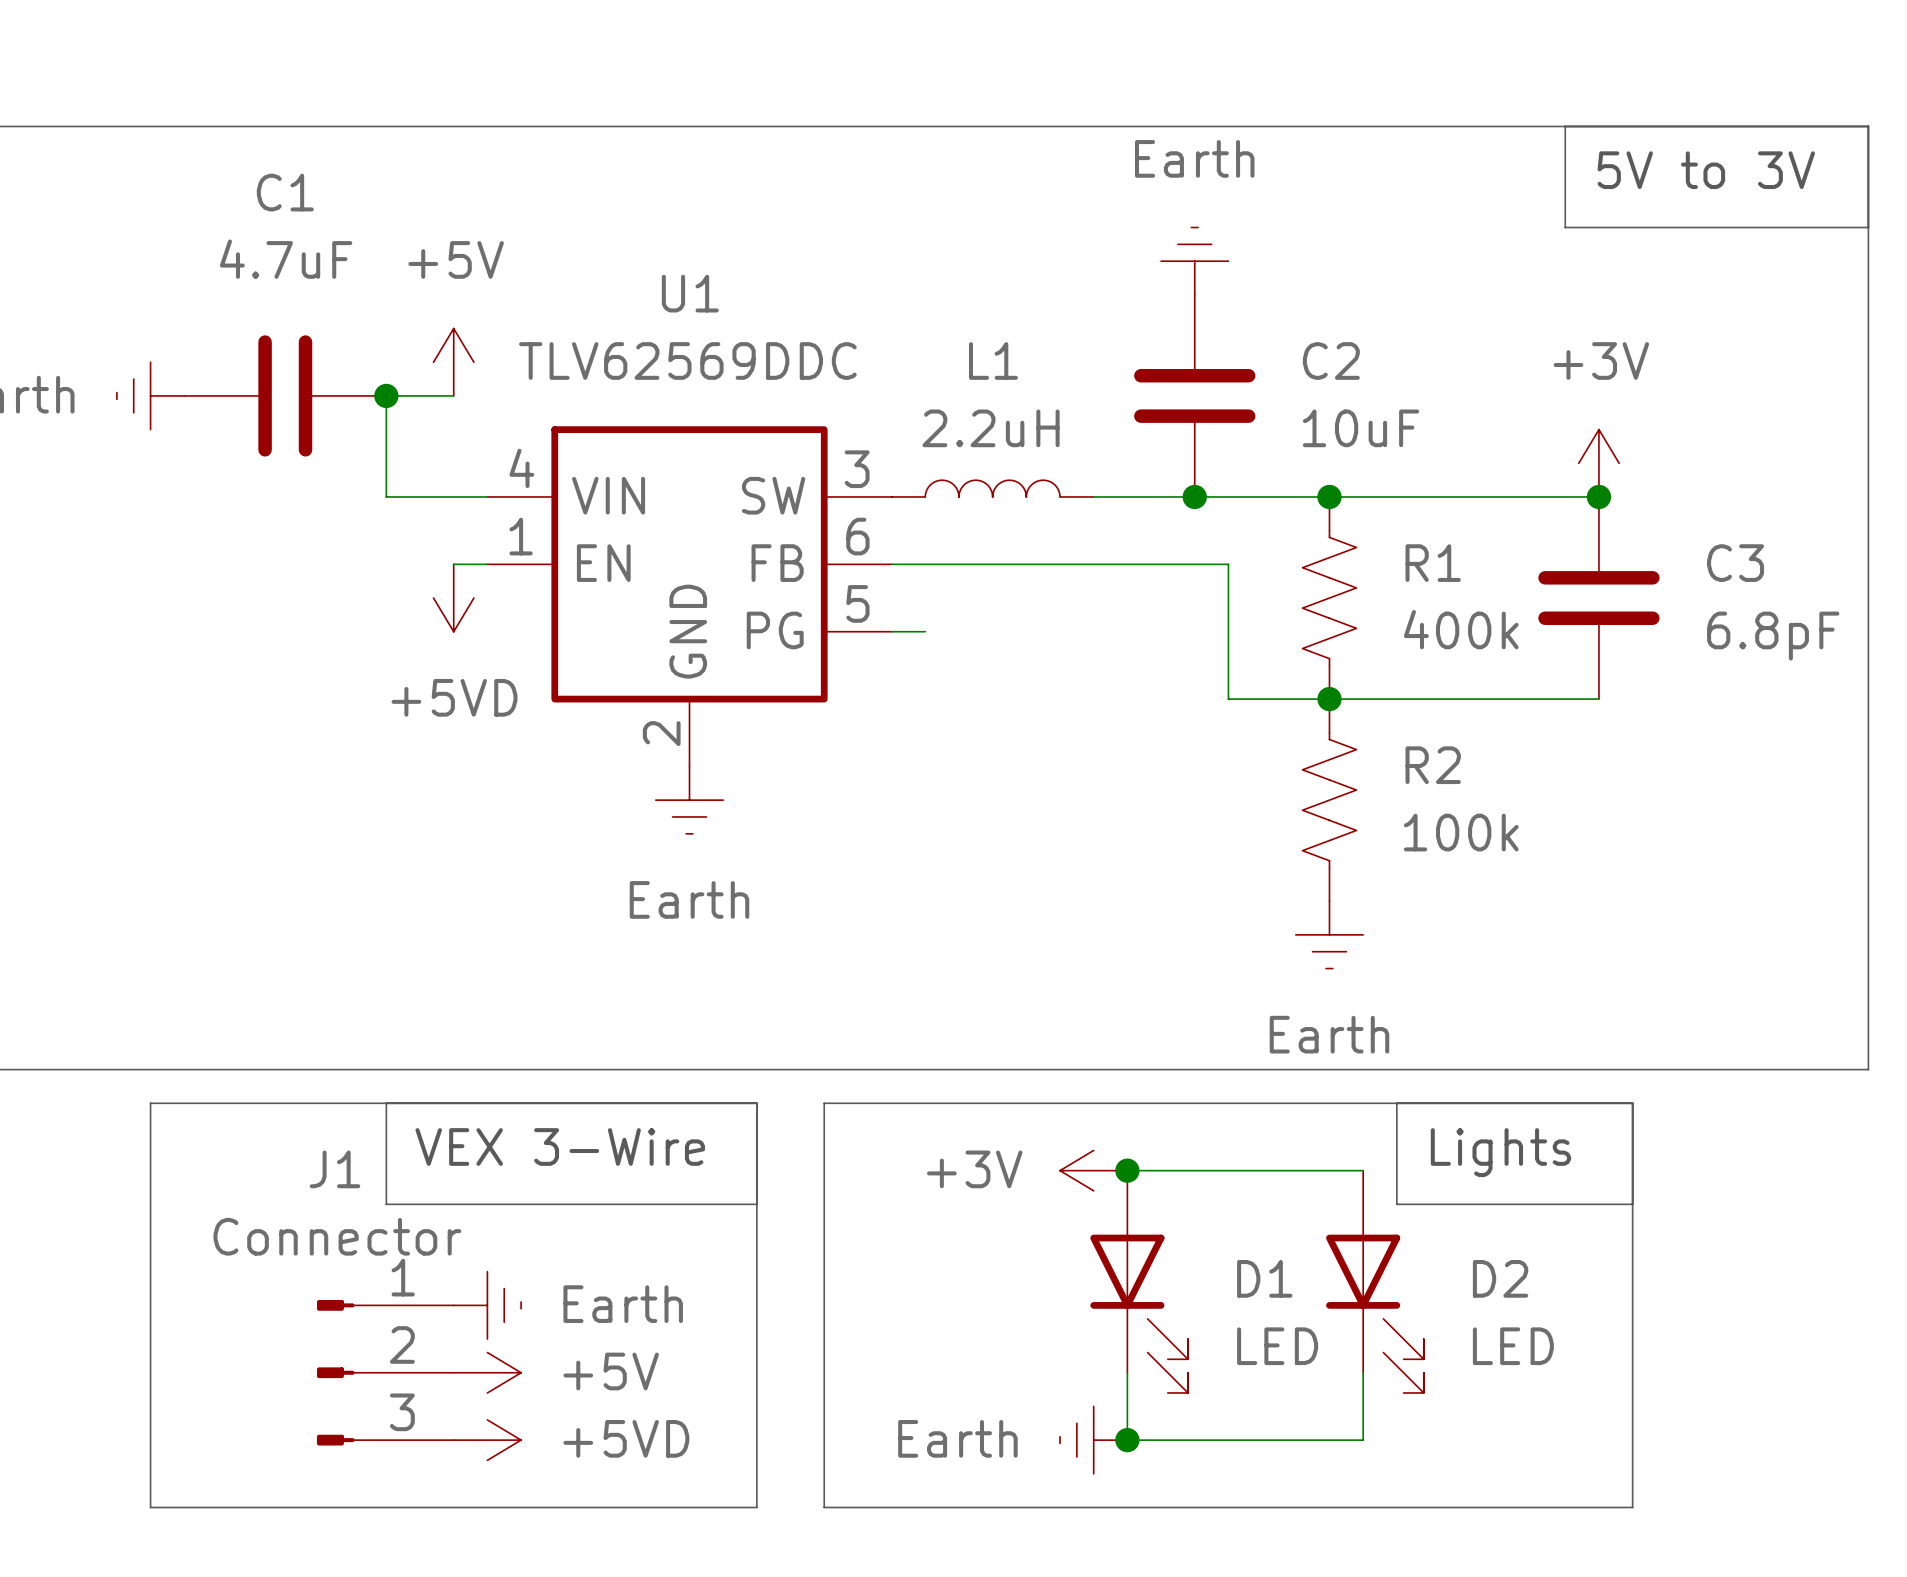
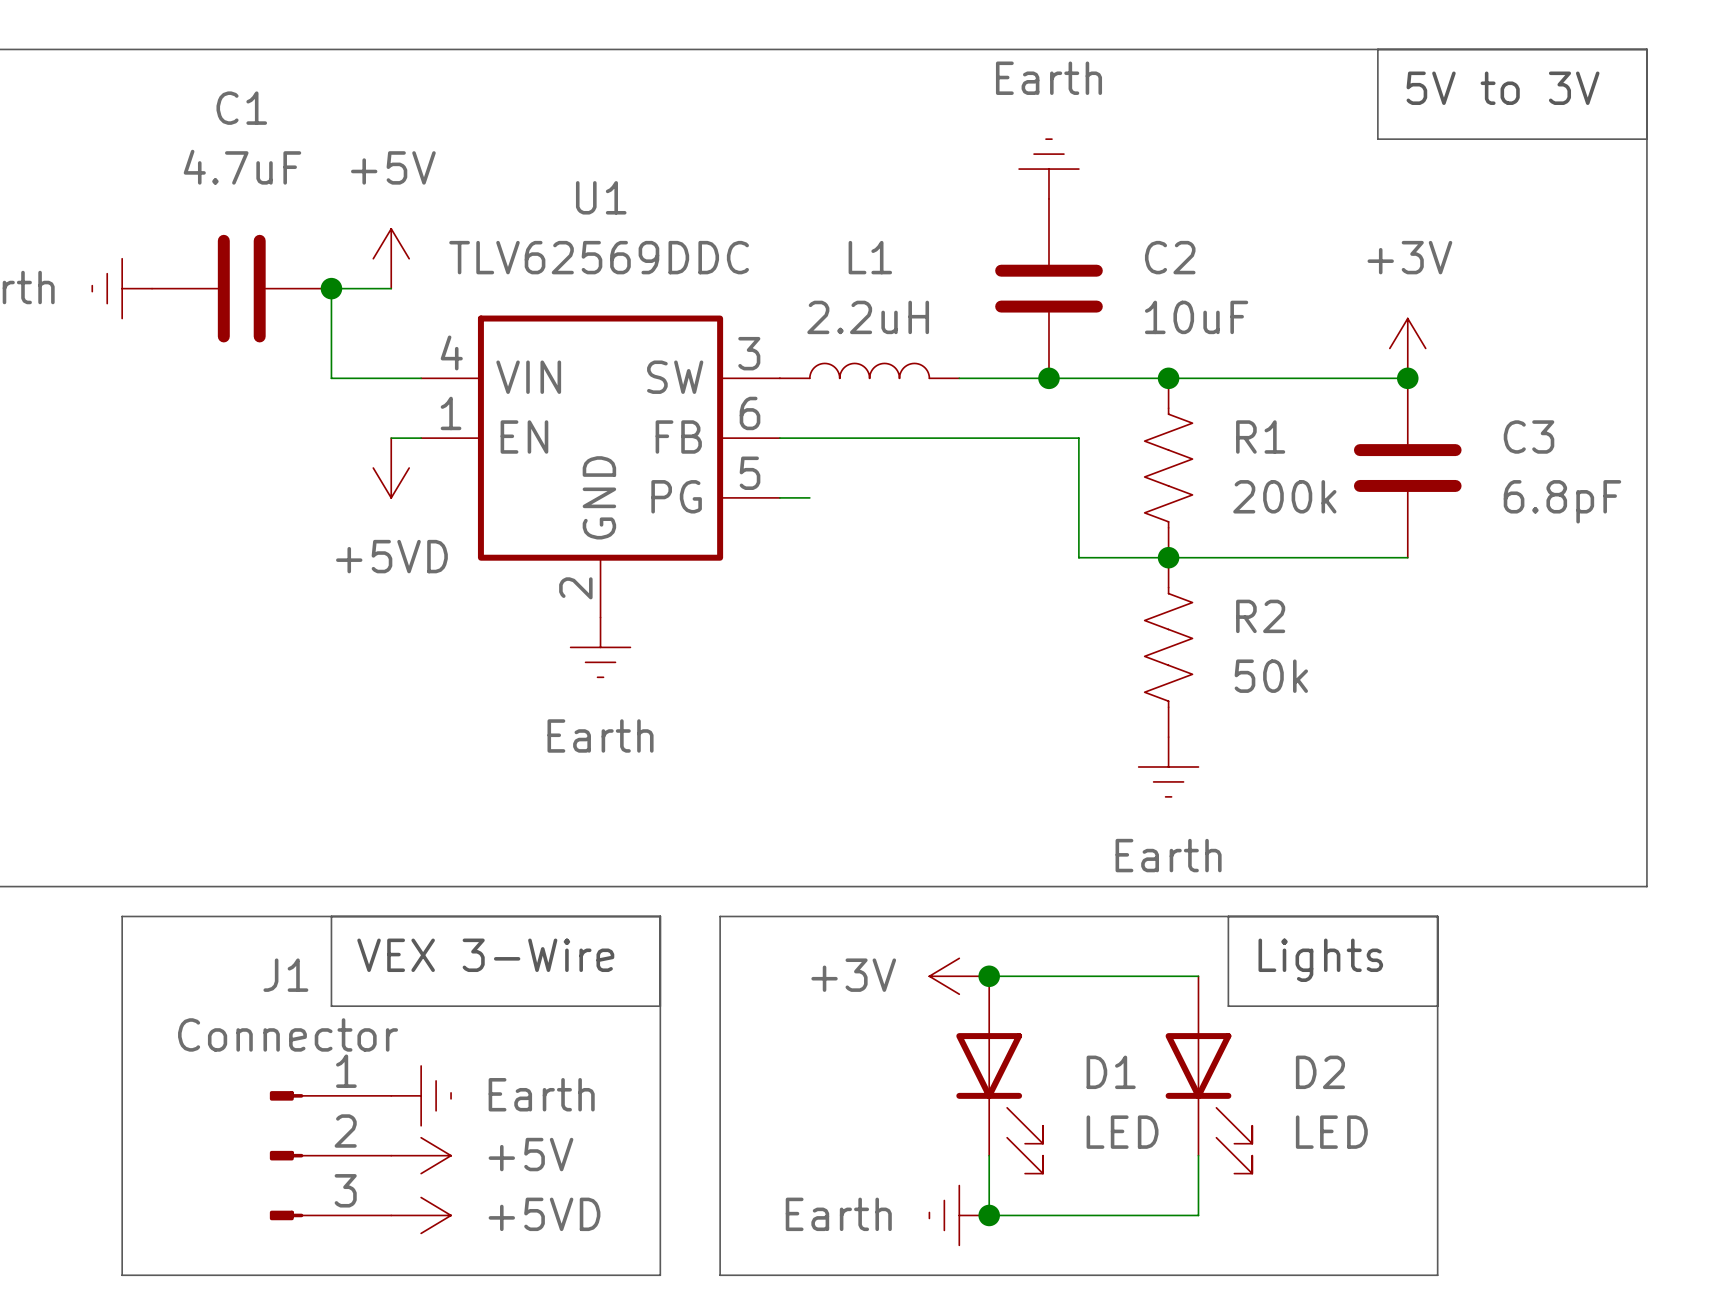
R1 value: 400k (1461, 629) -> 200k (1284, 496)
R2 value: 100k (1461, 832) -> 50k (1271, 676)

